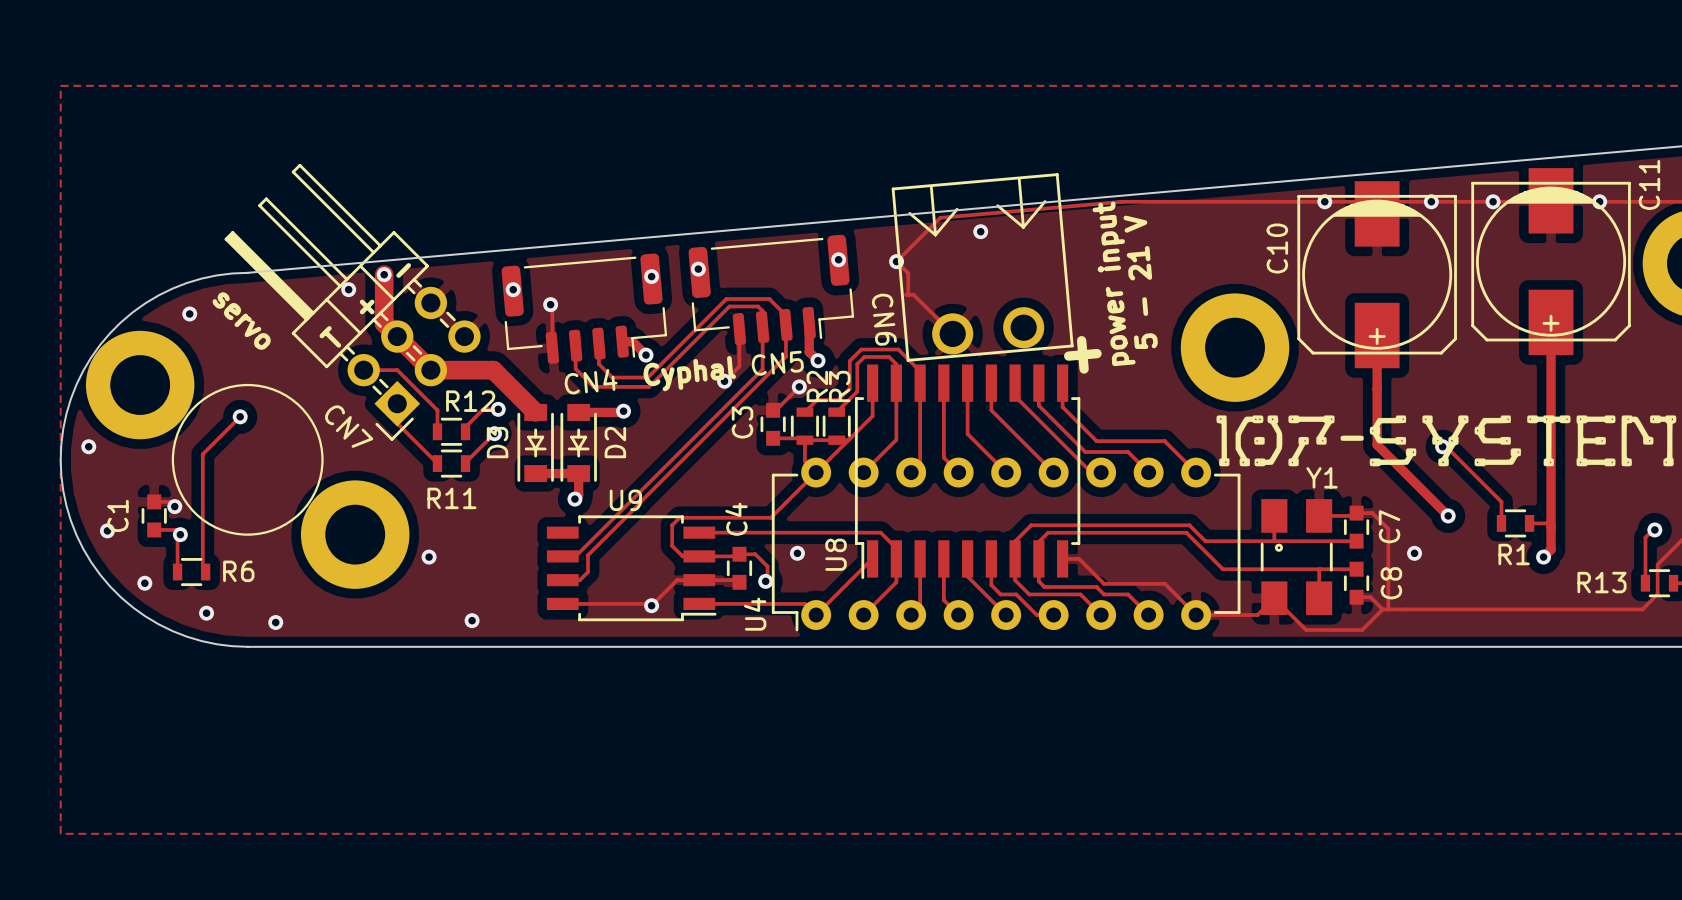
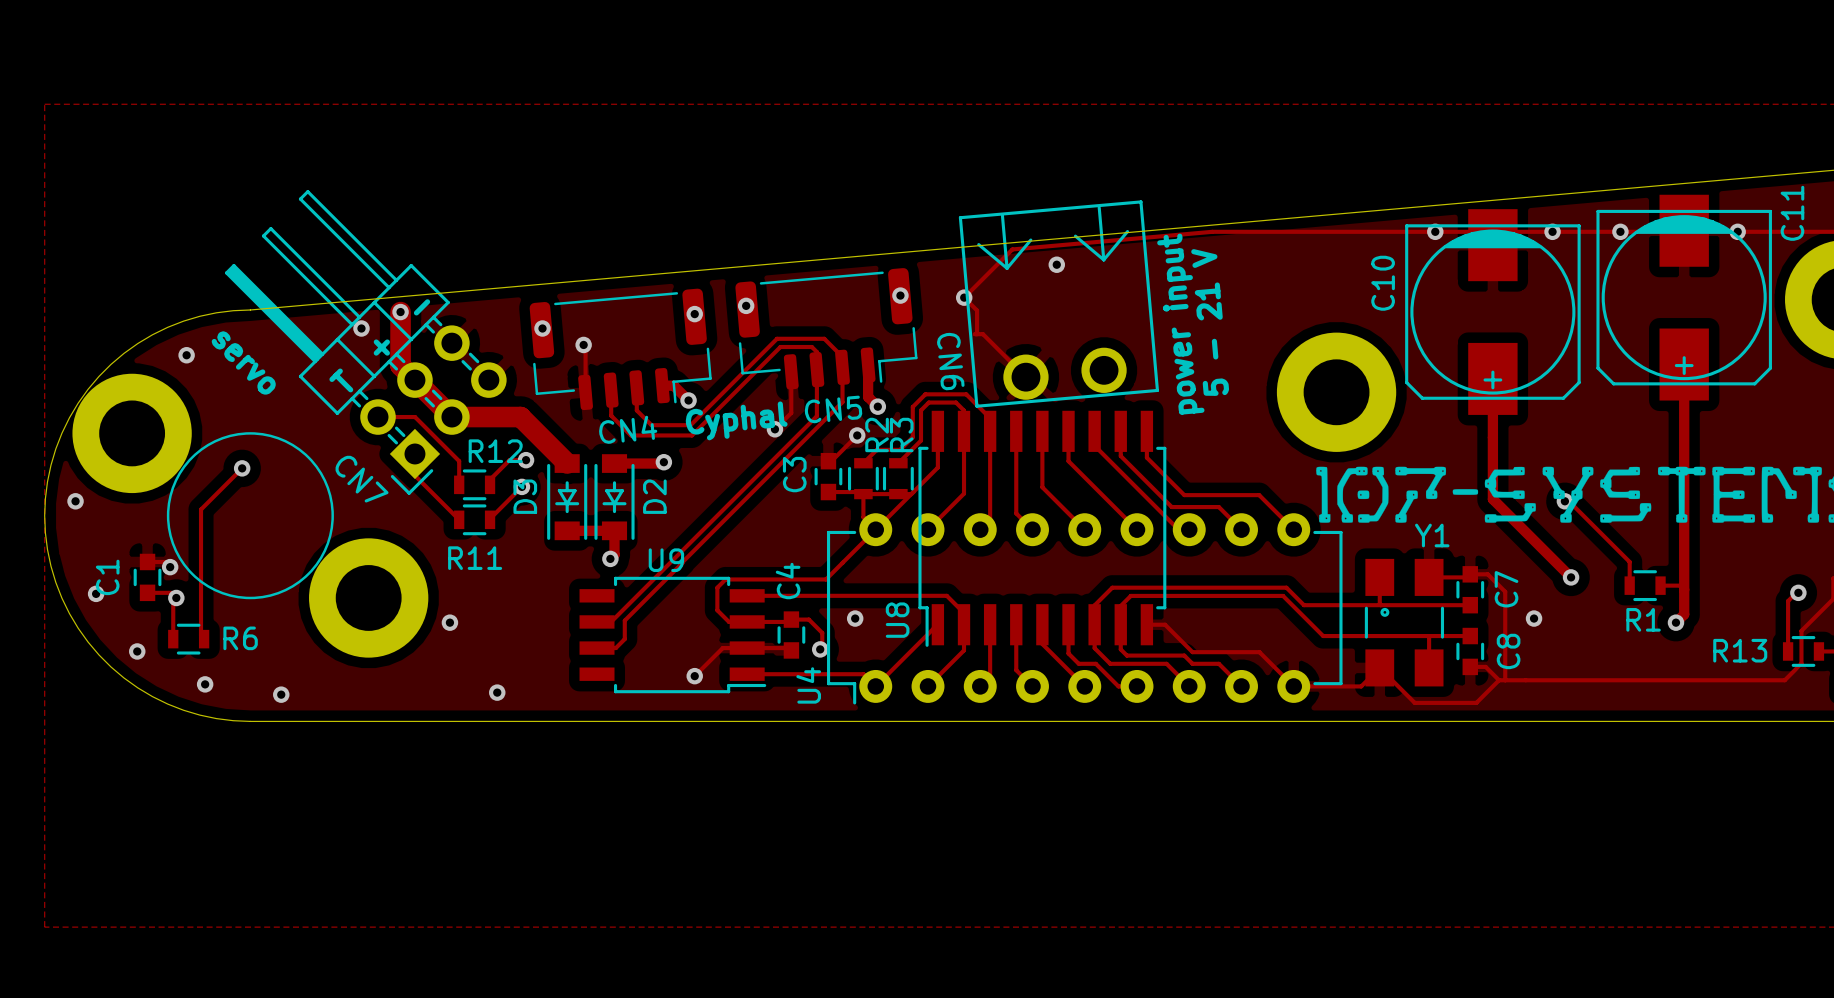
text: 5 - 21 V (1140, 282) -> none
text: power input (1114, 283) -> 5 - 21 V (1210, 322)
text: none -> power input (1180, 324)
text: + (1082, 354) -> none
track: (562, 603) (649, 603) (651, 605) -> none

